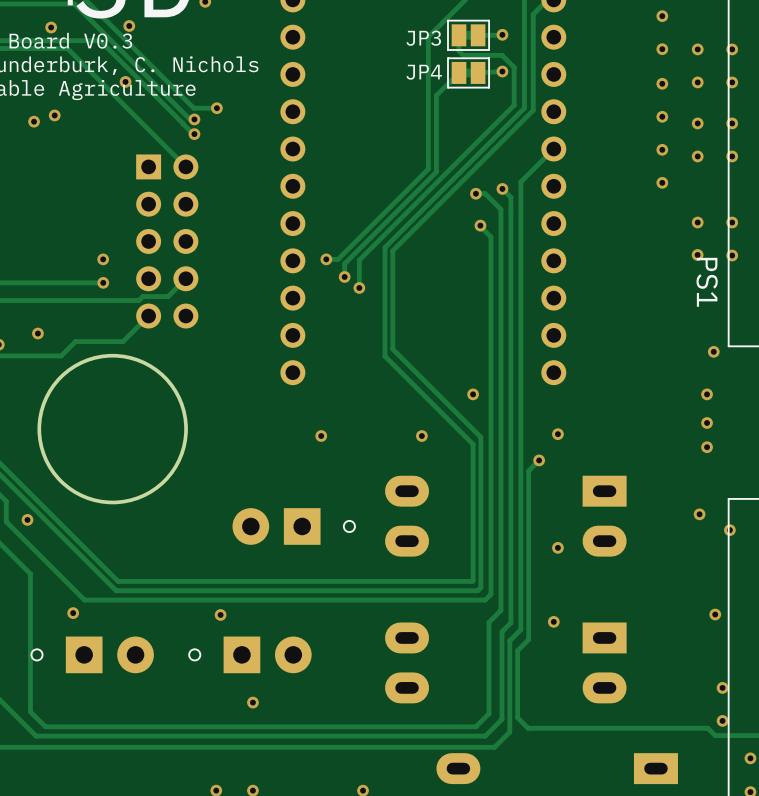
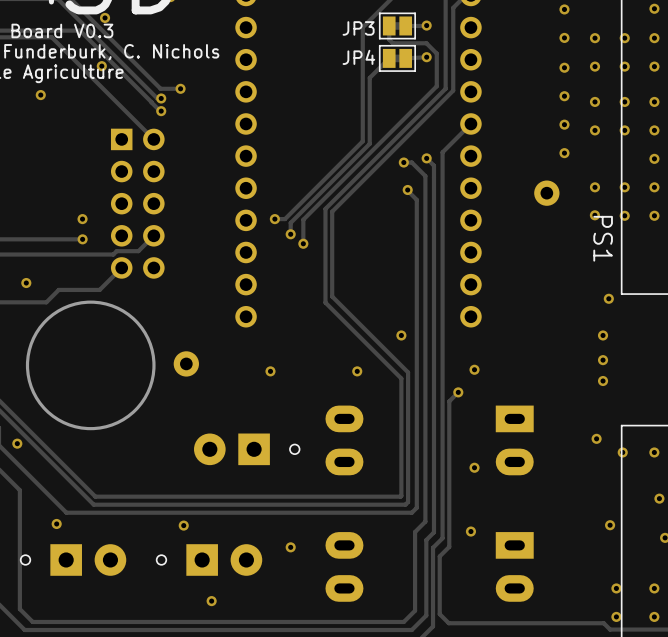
via: (51, 27) -> none
via: (34, 121) -> none
part: none -> (546, 193)
part: none -> (186, 363)
via: none -> (290, 547)

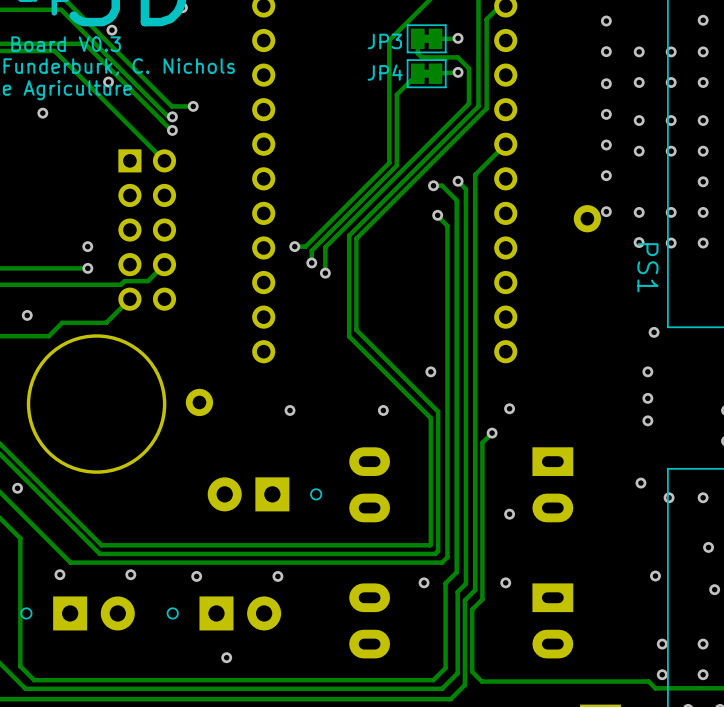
via: none -> (606, 211)
via: none -> (130, 574)
via: none -> (424, 582)
via position: (290, 547) -> (277, 576)

